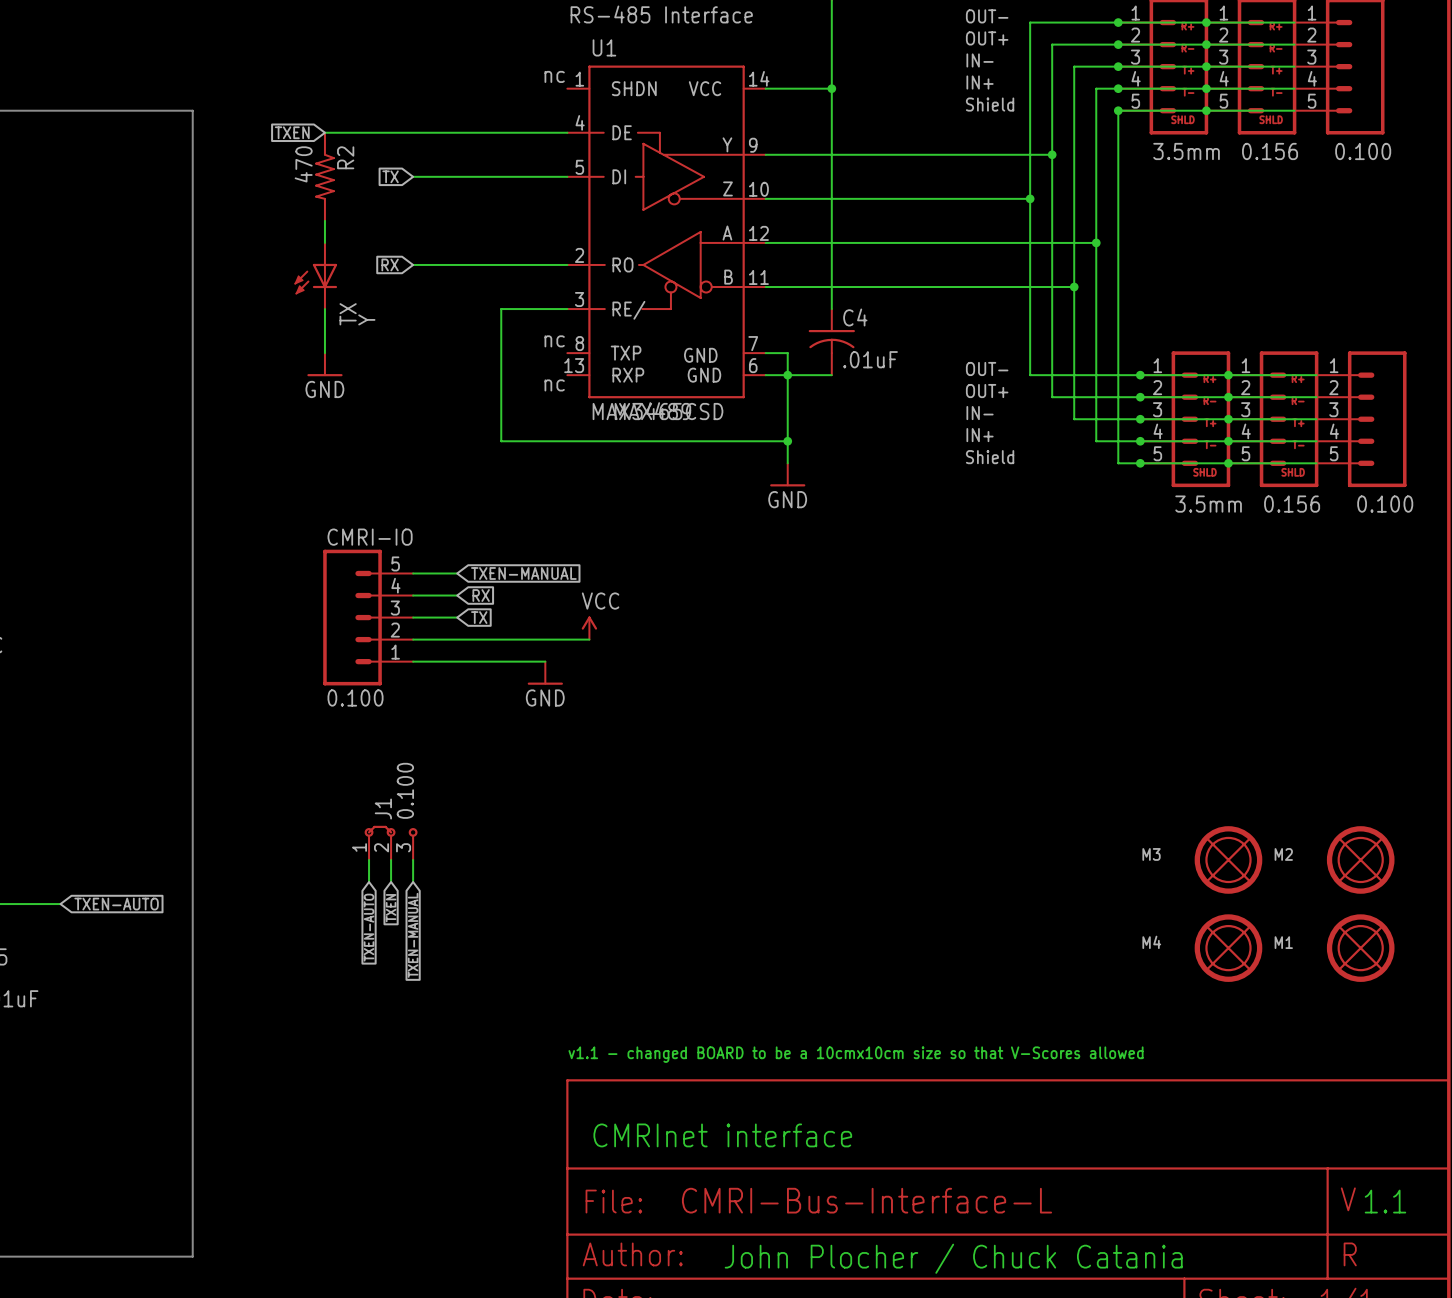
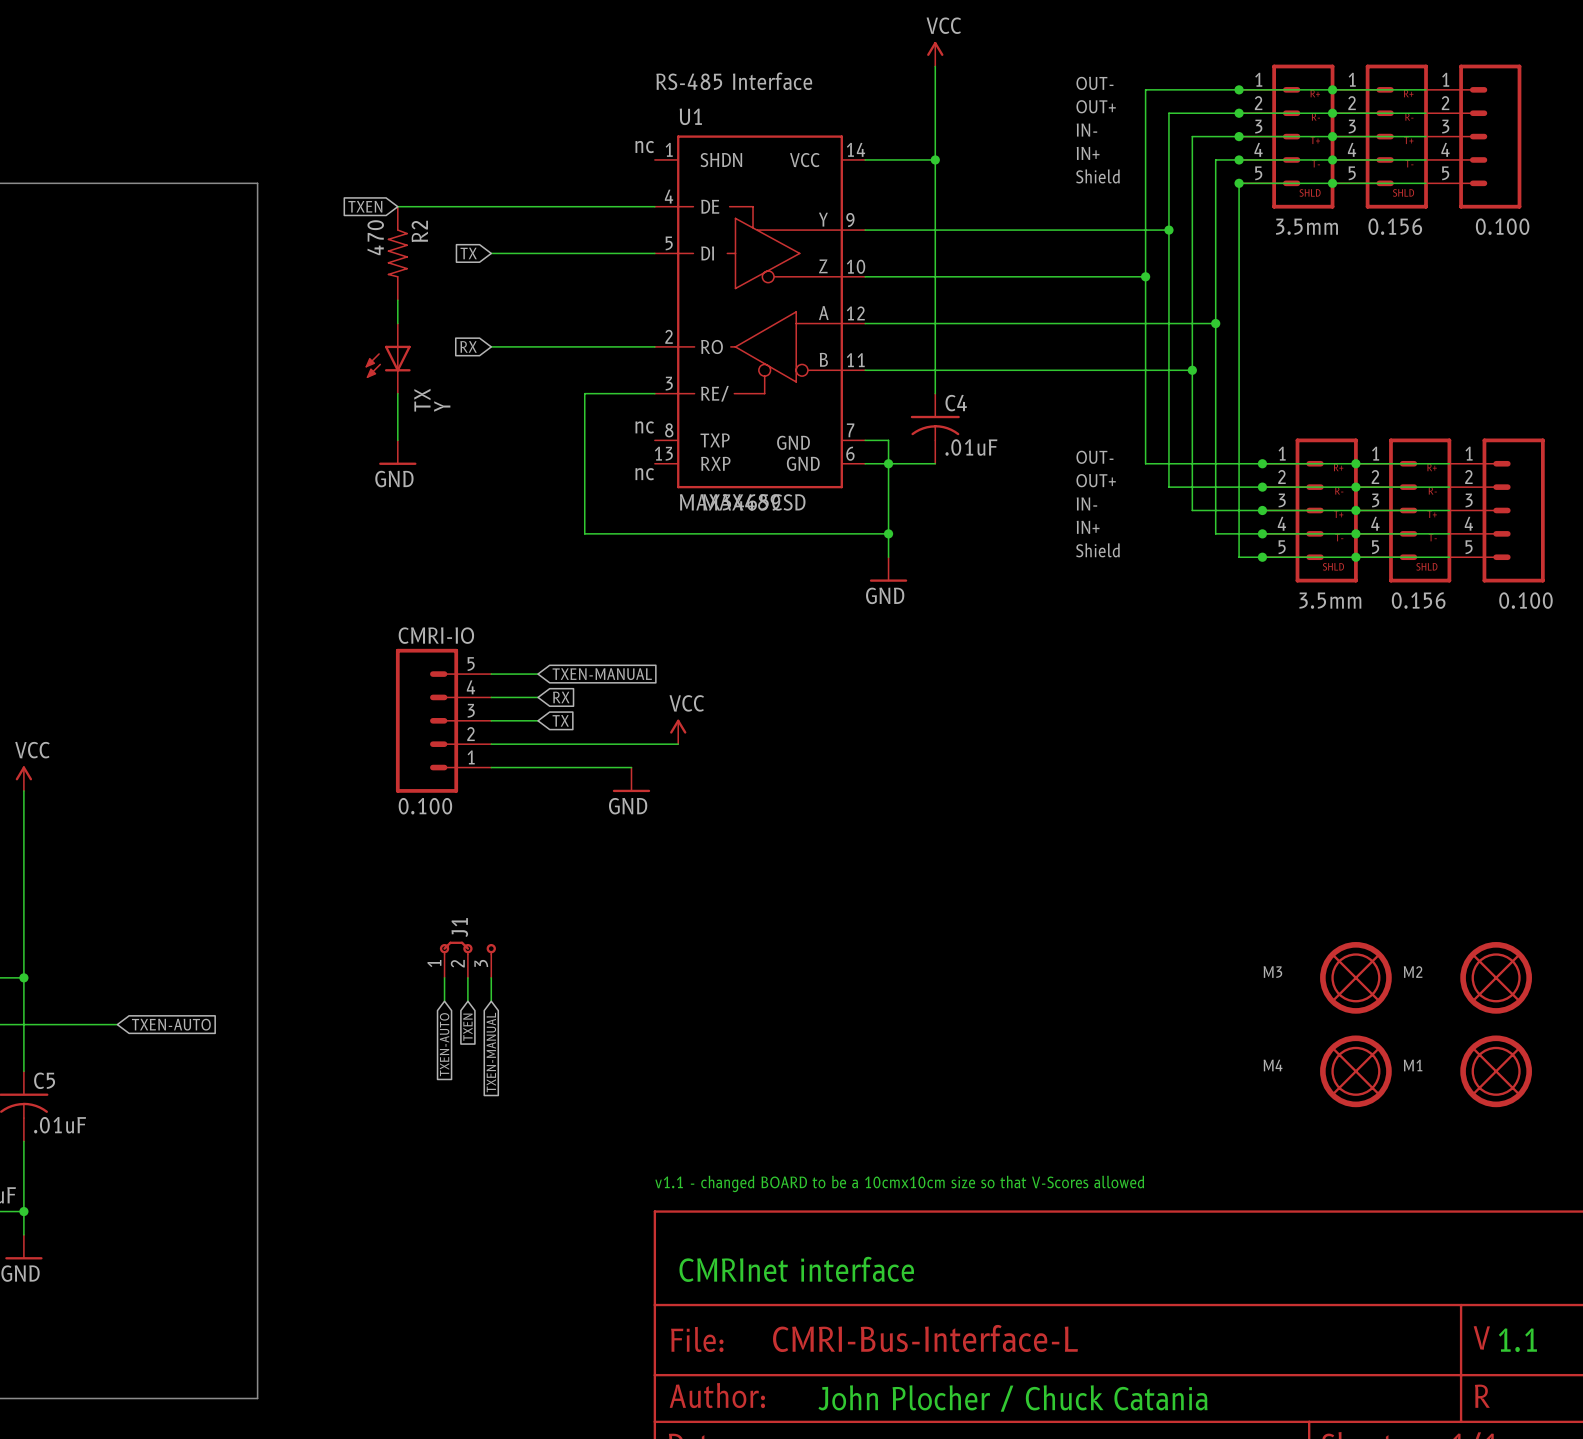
J1 value: 0.100 (405, 790) -> none

